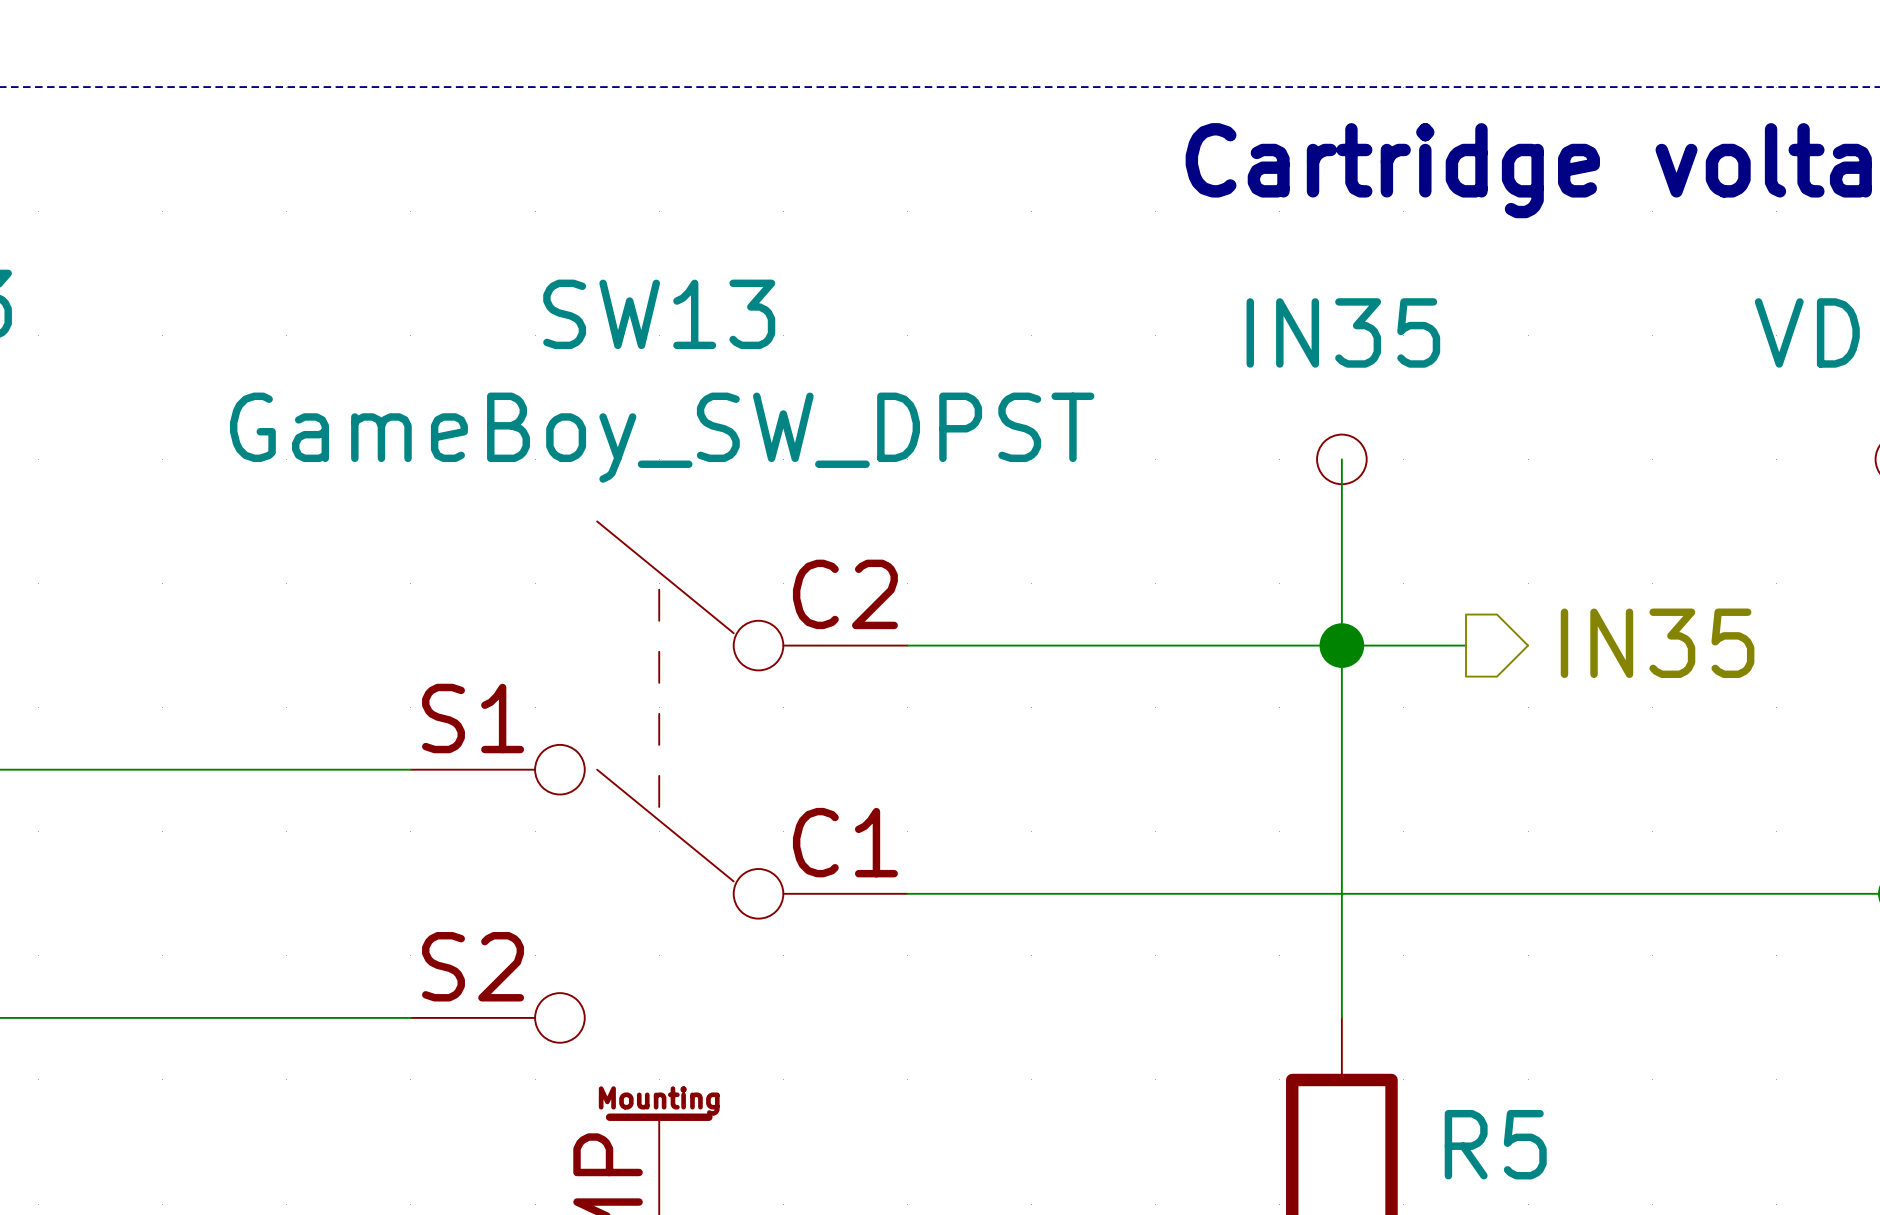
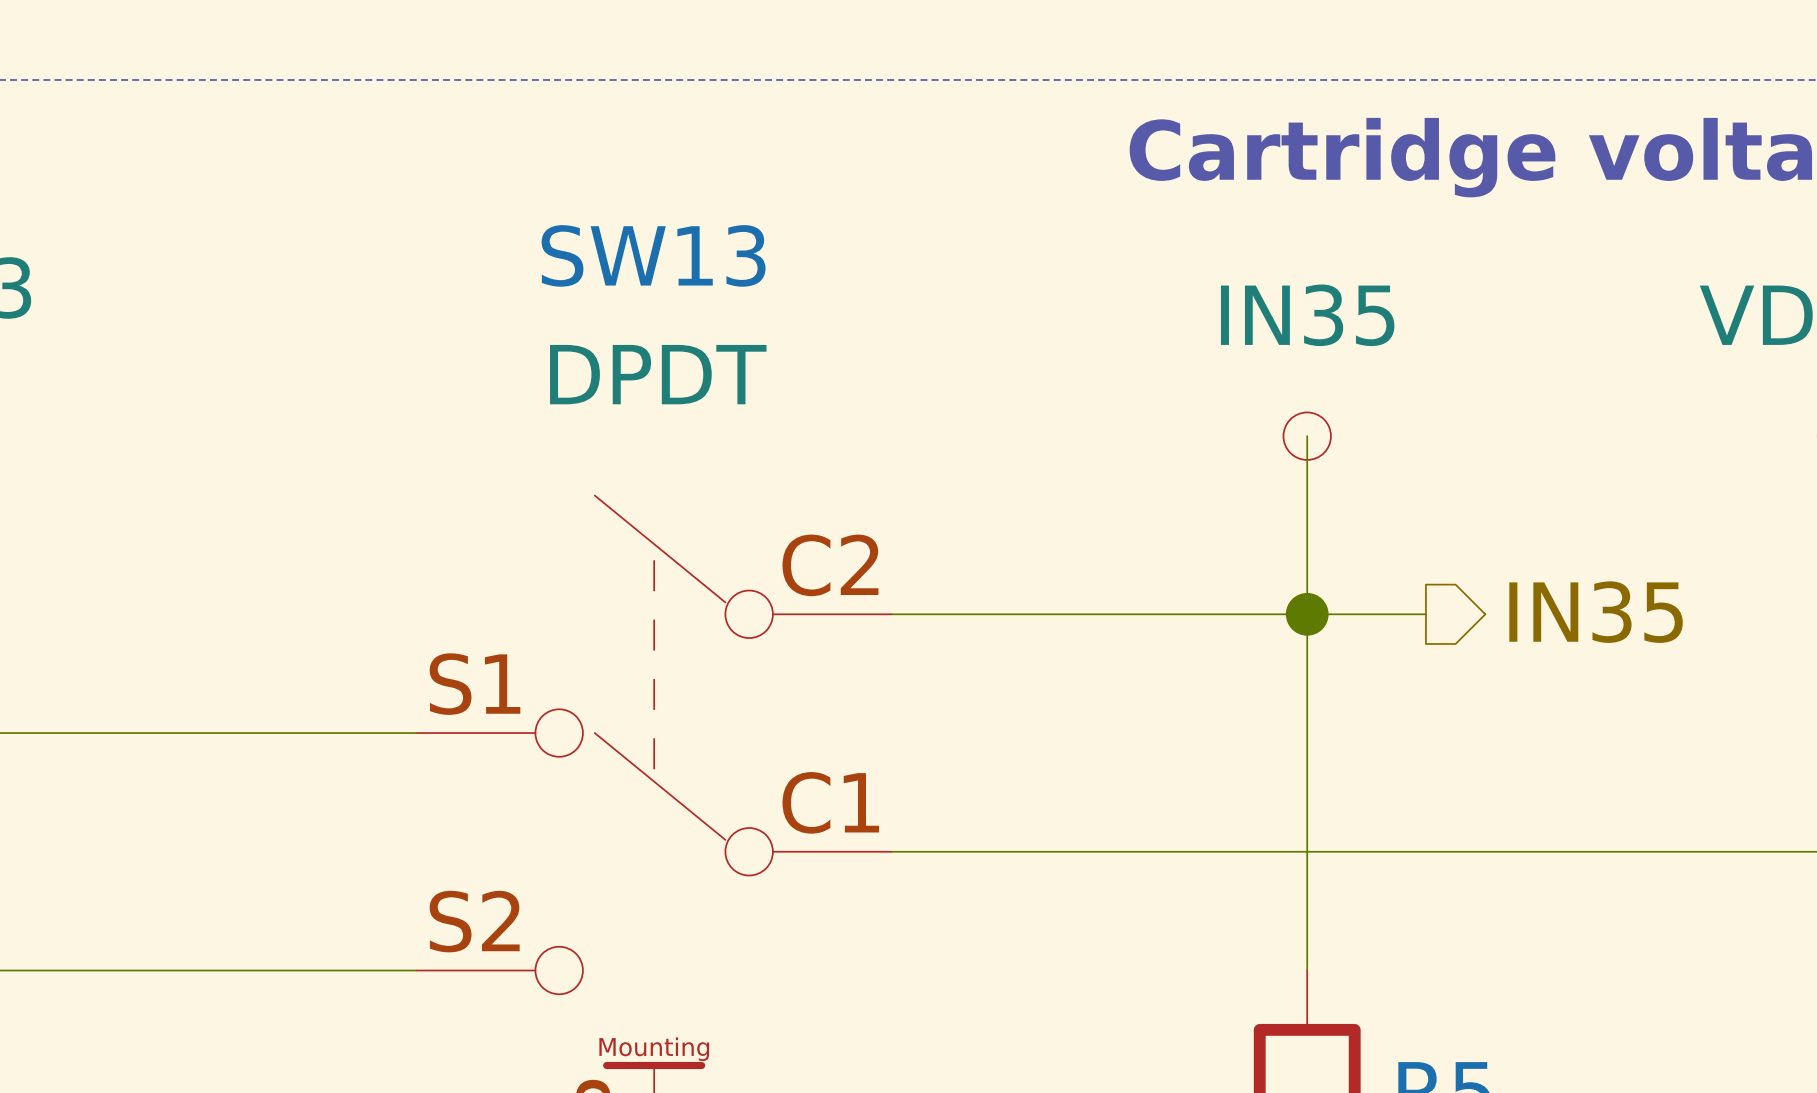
SW13 name position: SW13 (659, 314) -> SW13 (653, 255)
SW13 value: GameBoy_SW_DPST (662, 437) -> DPDT (658, 374)

